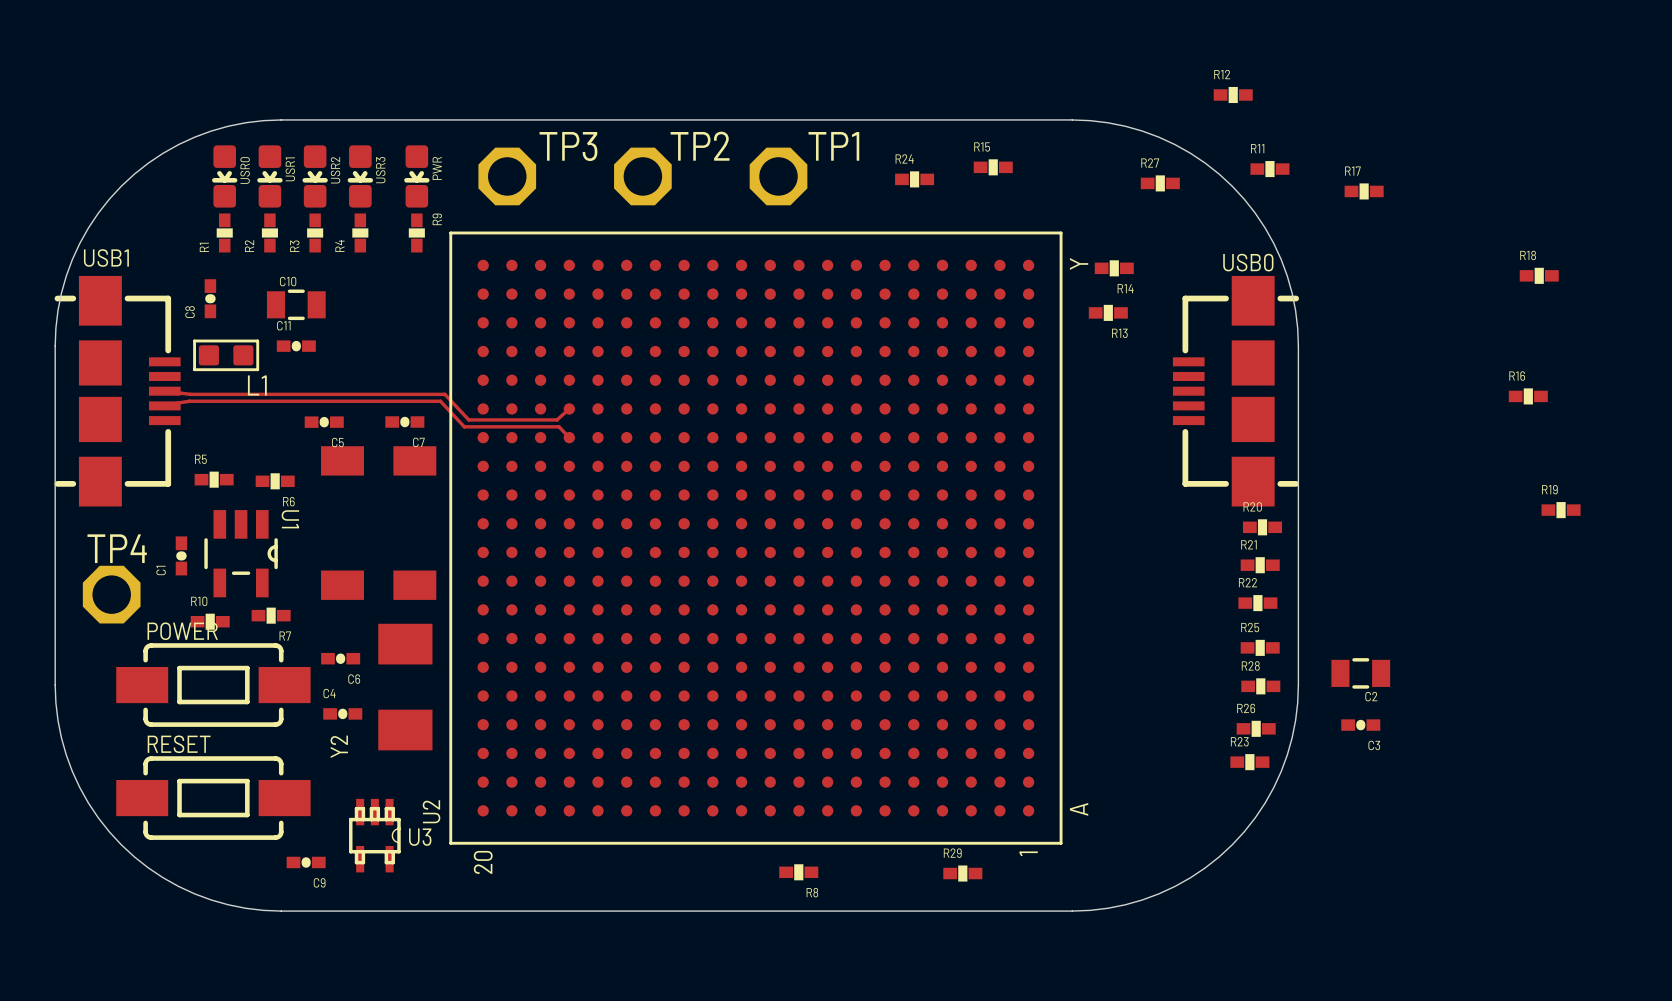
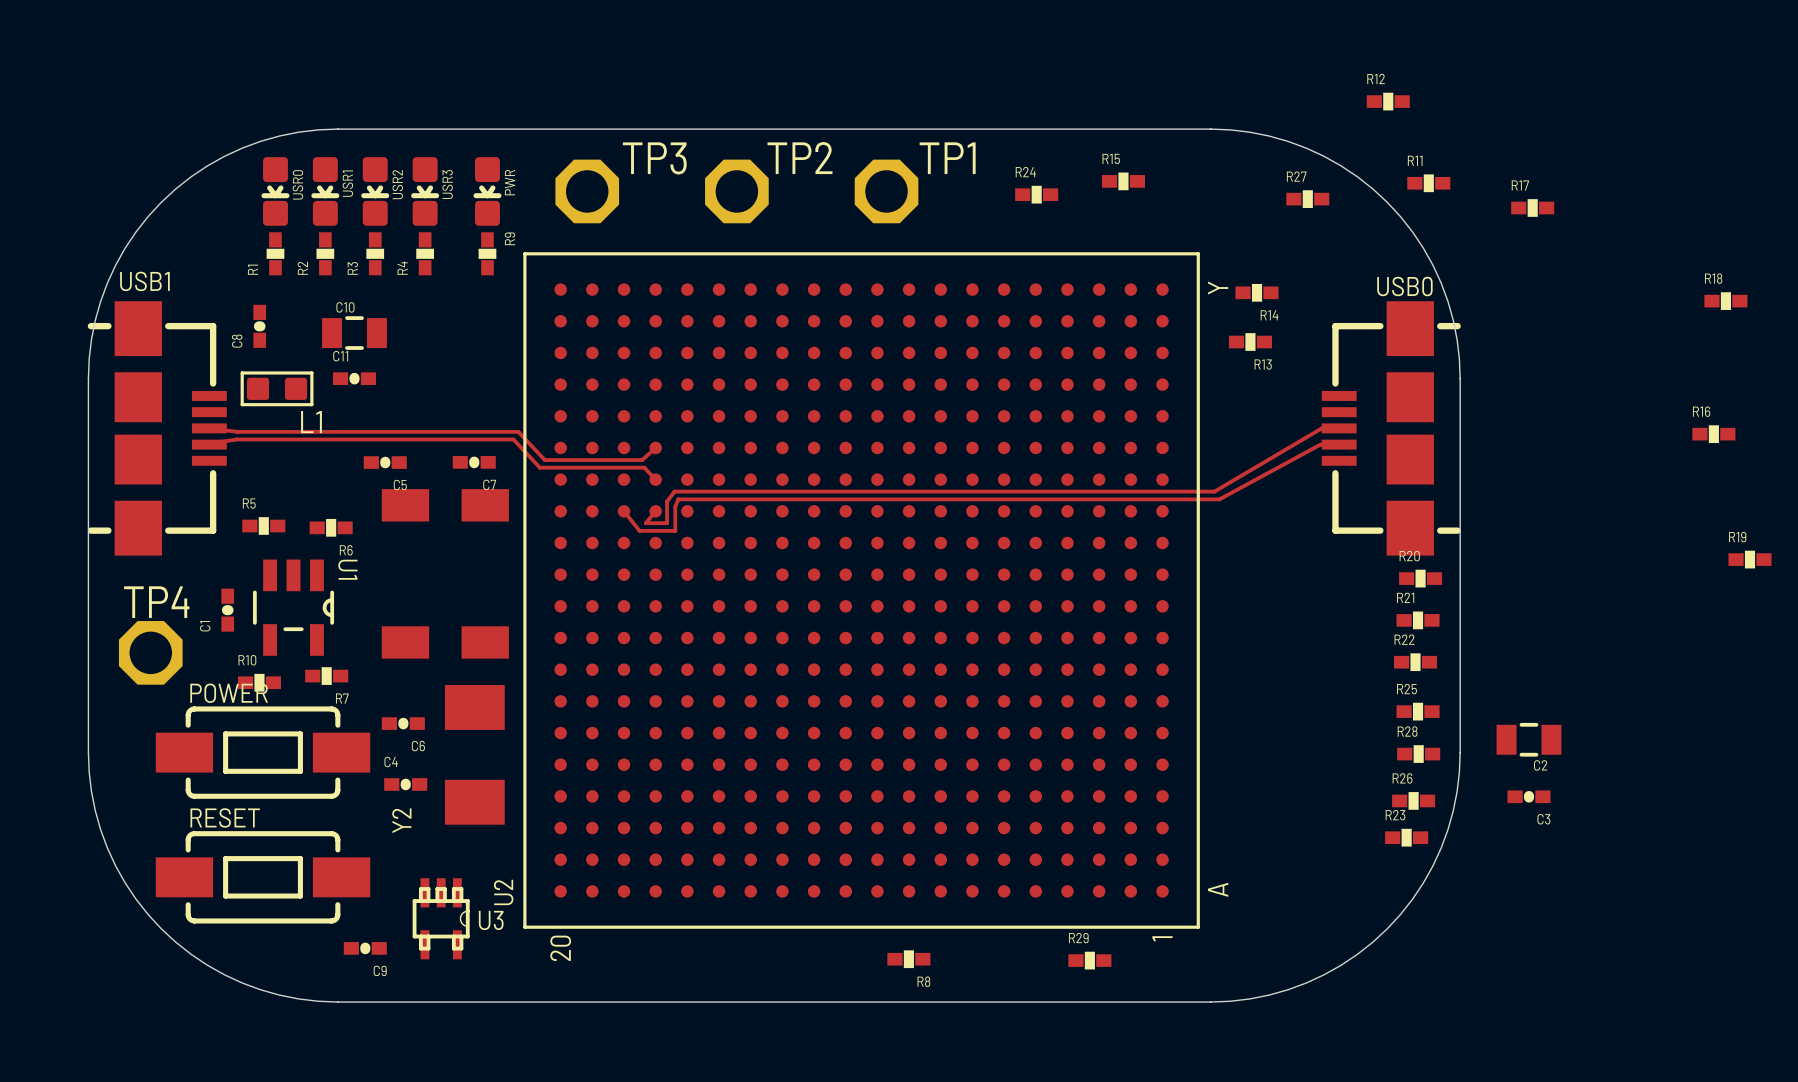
track: none -> (1339, 428) (1321, 428) (1214, 491) (674, 491) (667, 501) (667, 523) (645, 523) (655, 511)
track: none -> (1339, 444) (1320, 444) (1219, 499) (678, 499) (675, 506) (675, 530) (639, 530) (624, 511)

